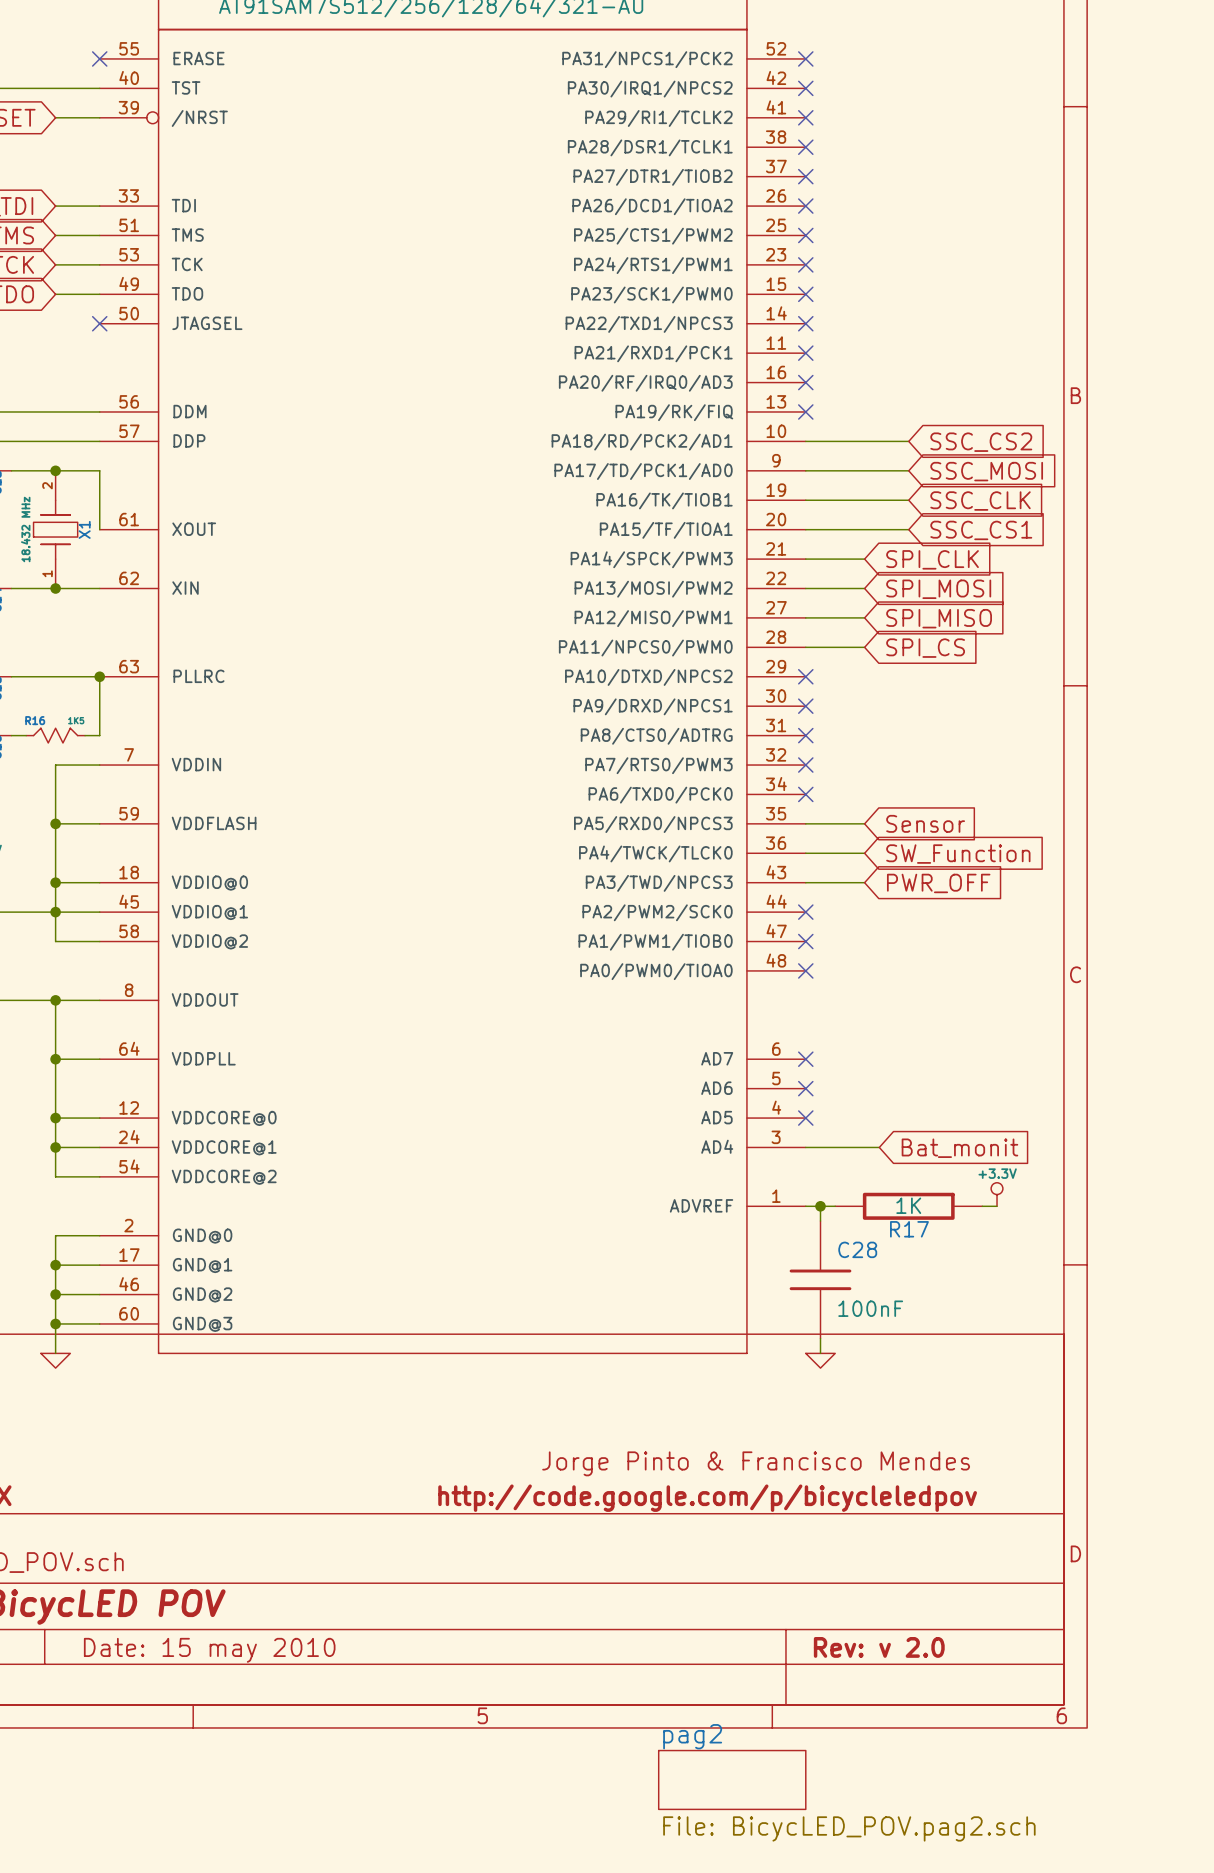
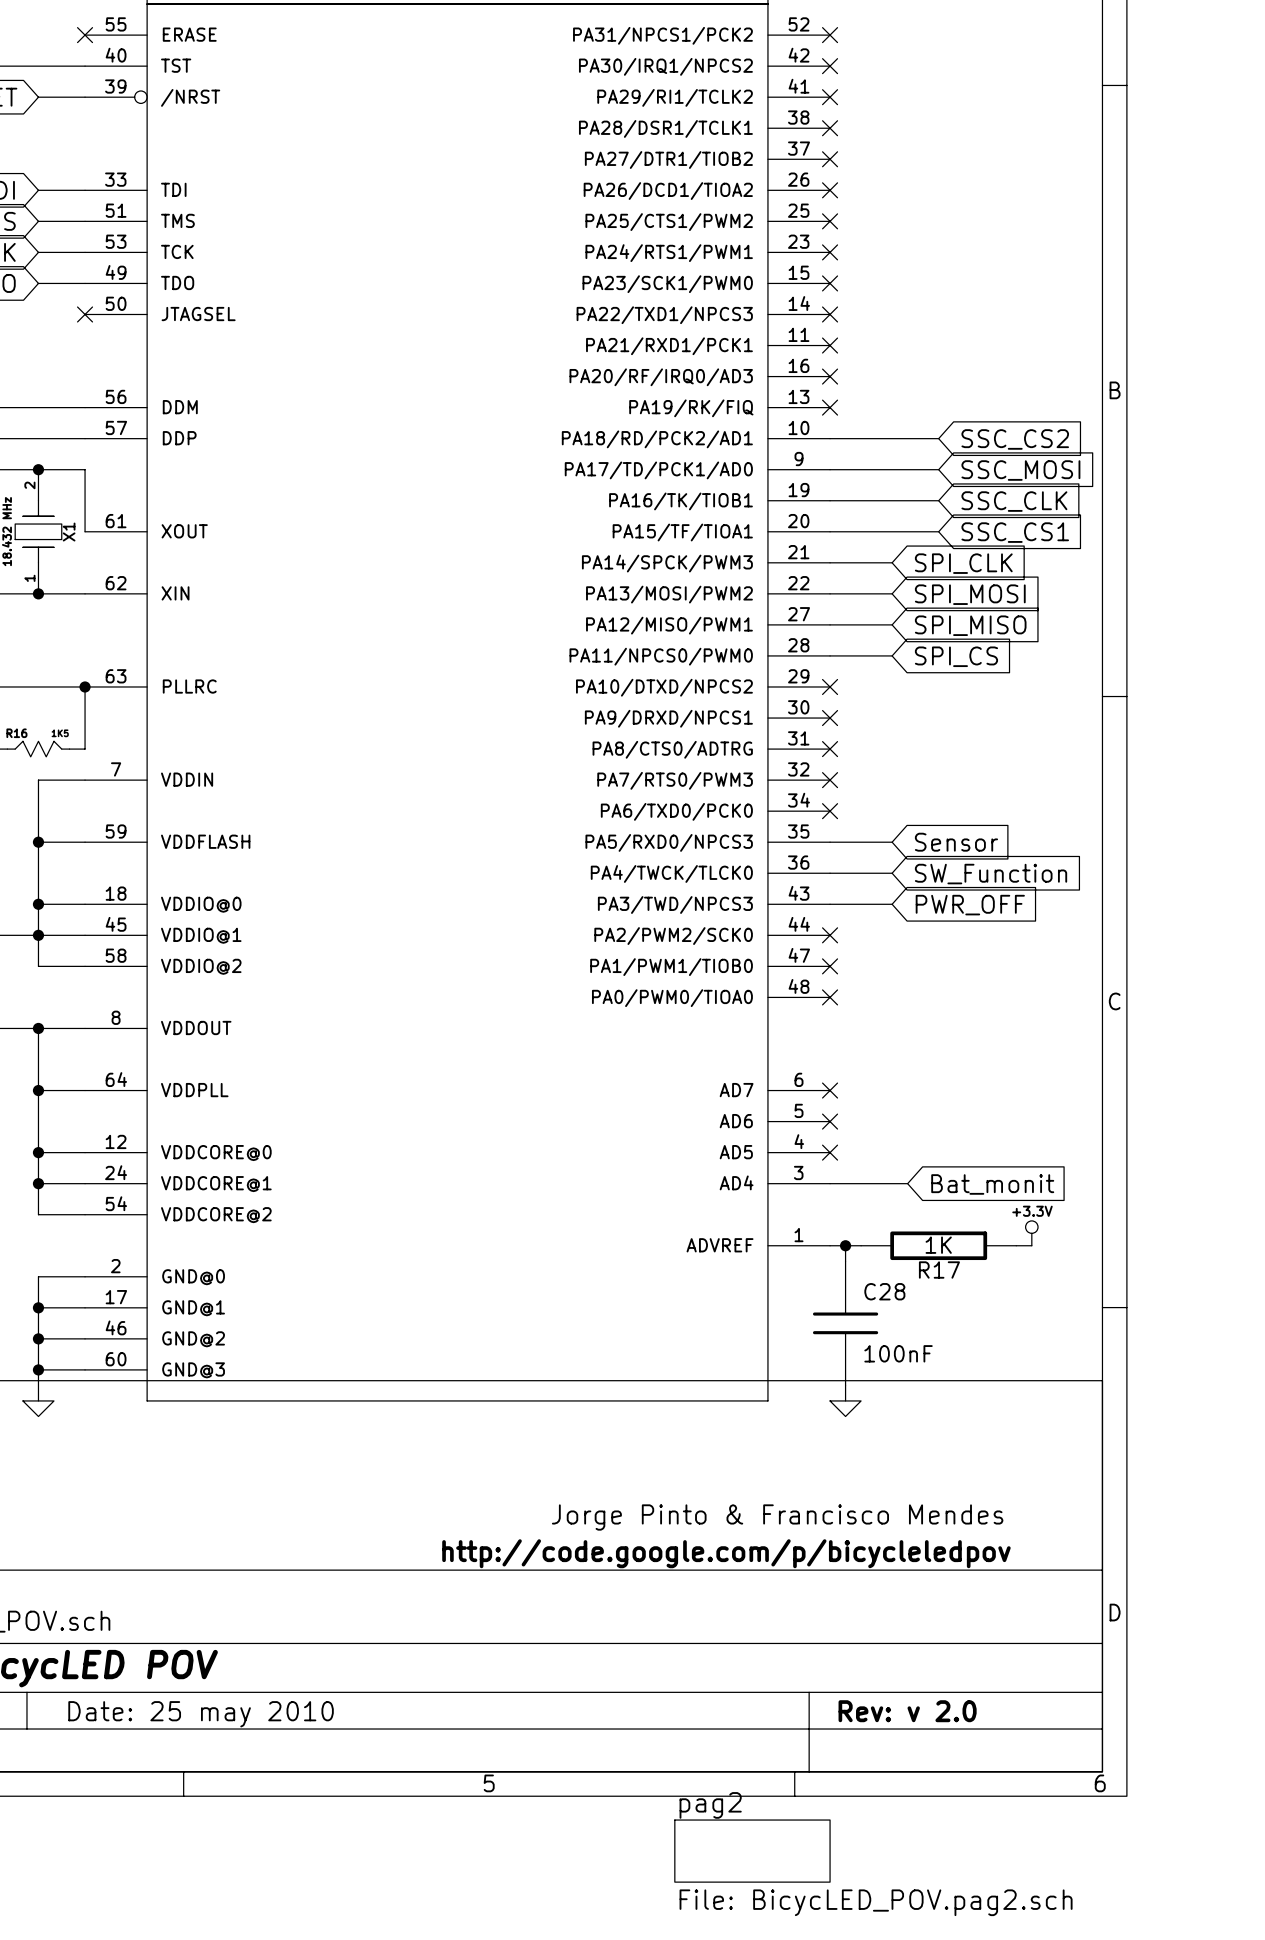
title block: Date: 15 may 2010 (209, 1650) -> Date: 25 may 2010 (201, 1714)

